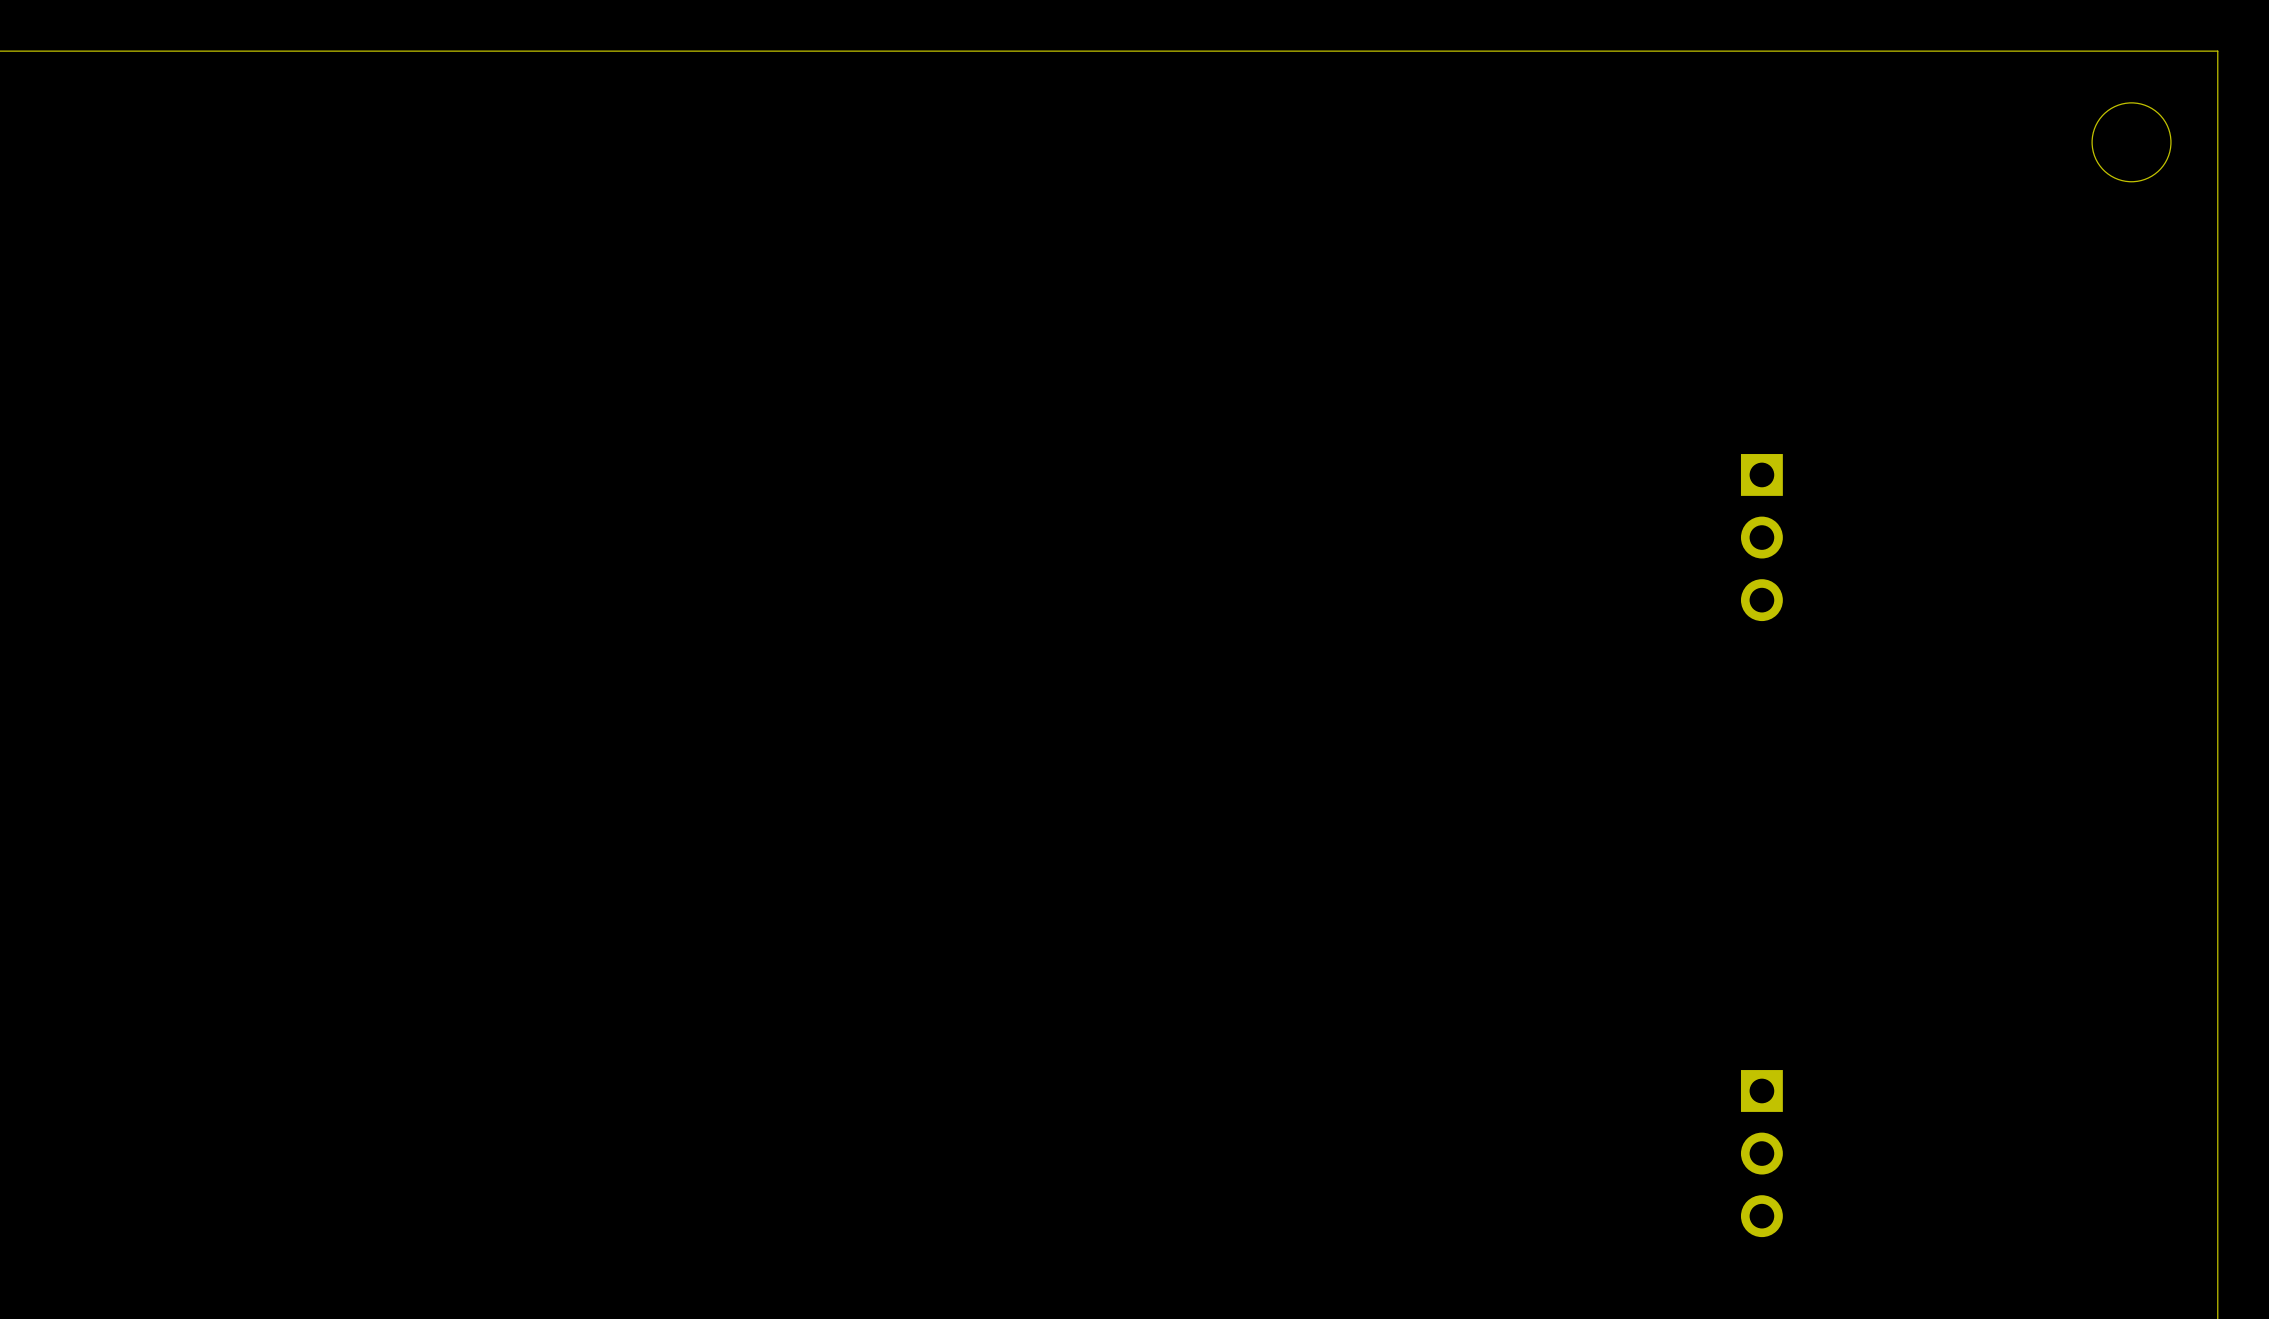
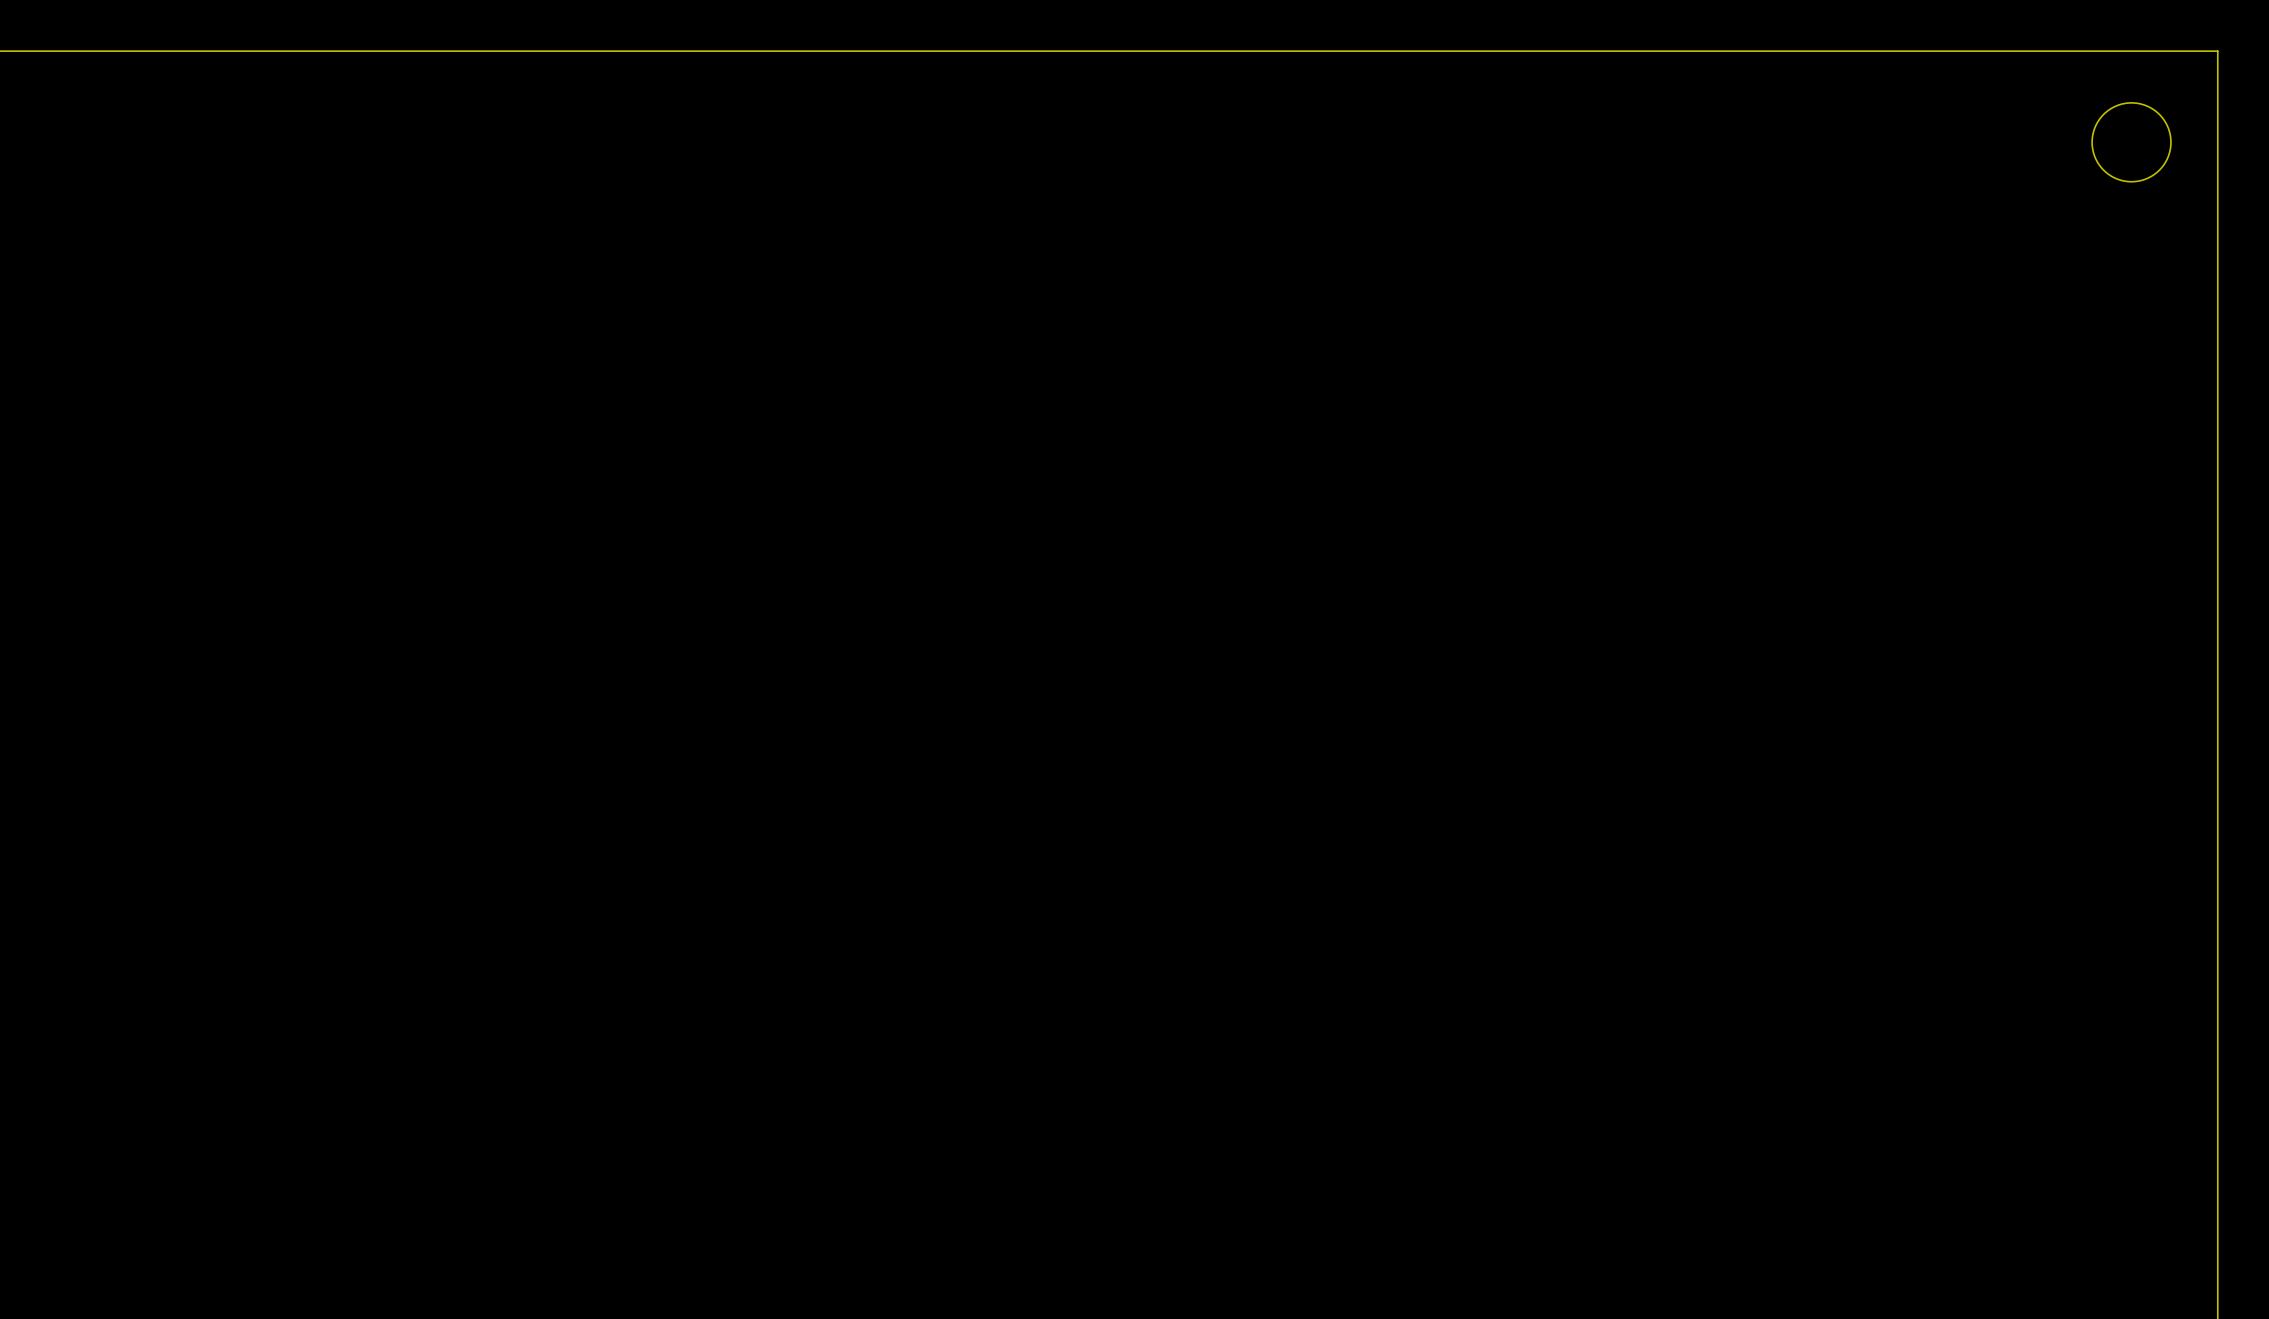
part: (1761, 537) -> none
part: (1761, 1153) -> none

